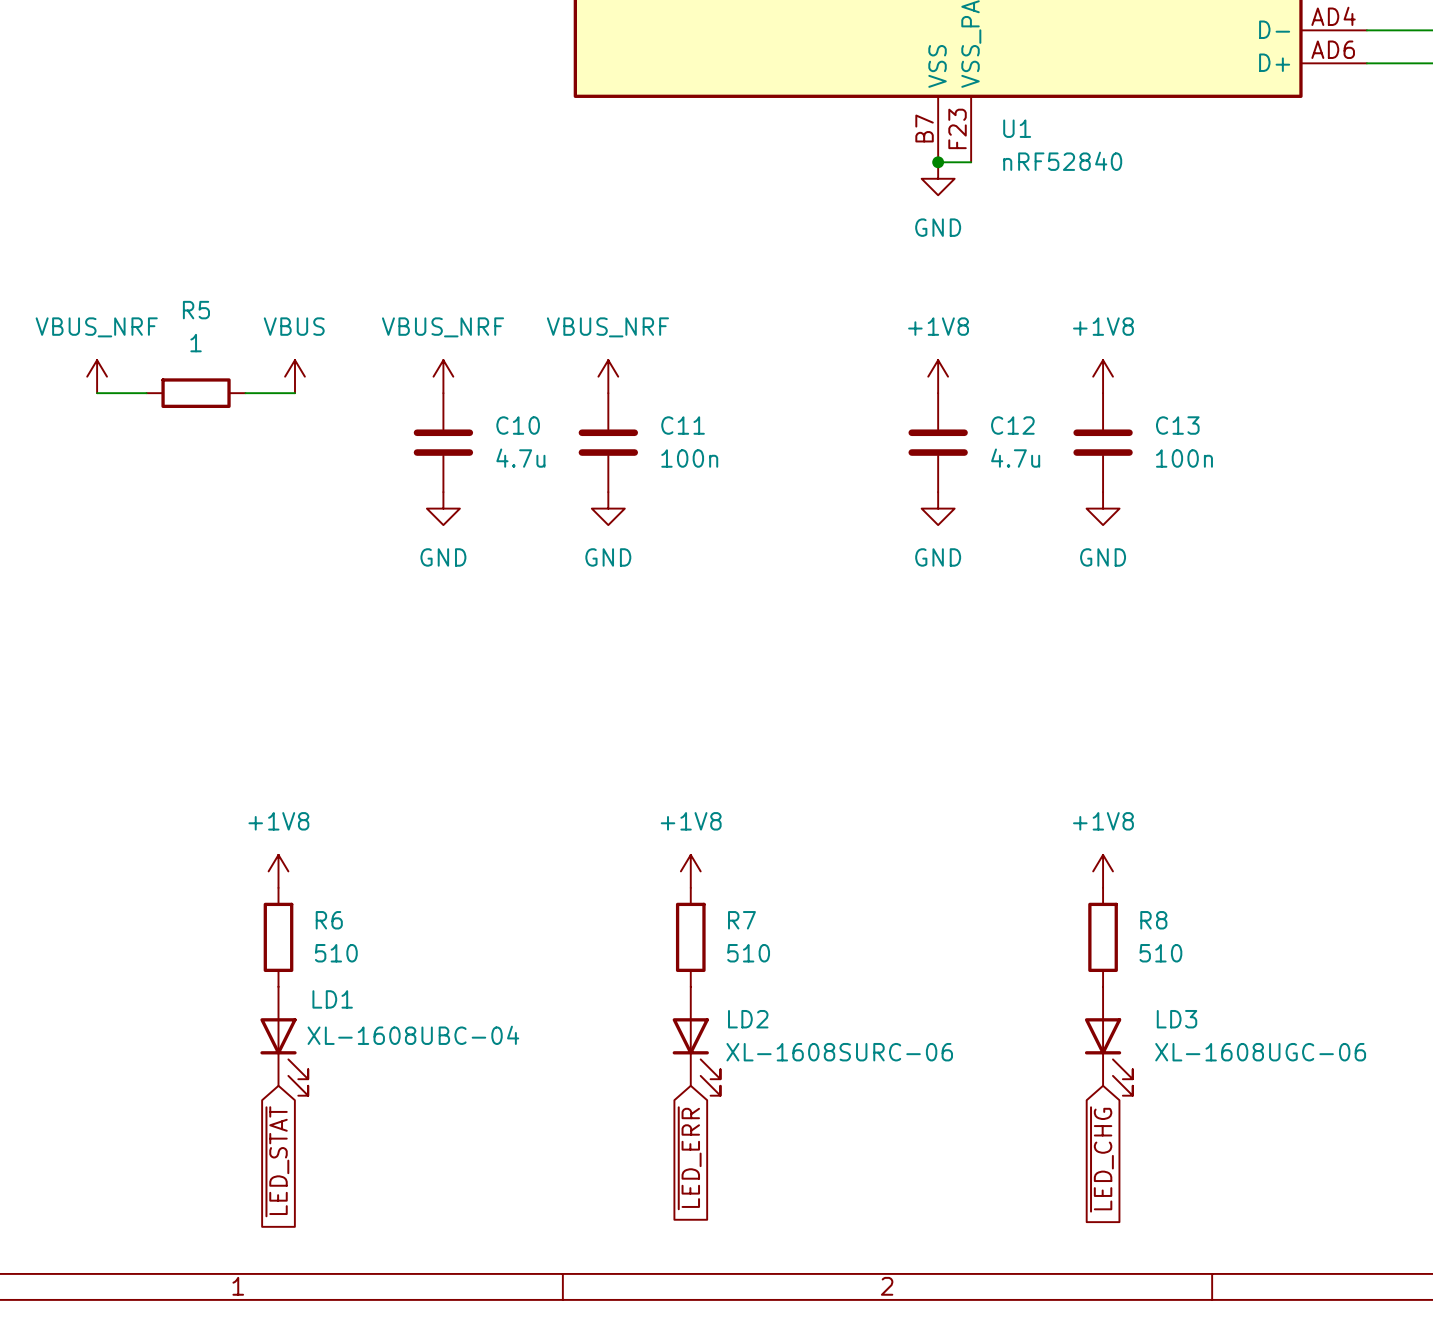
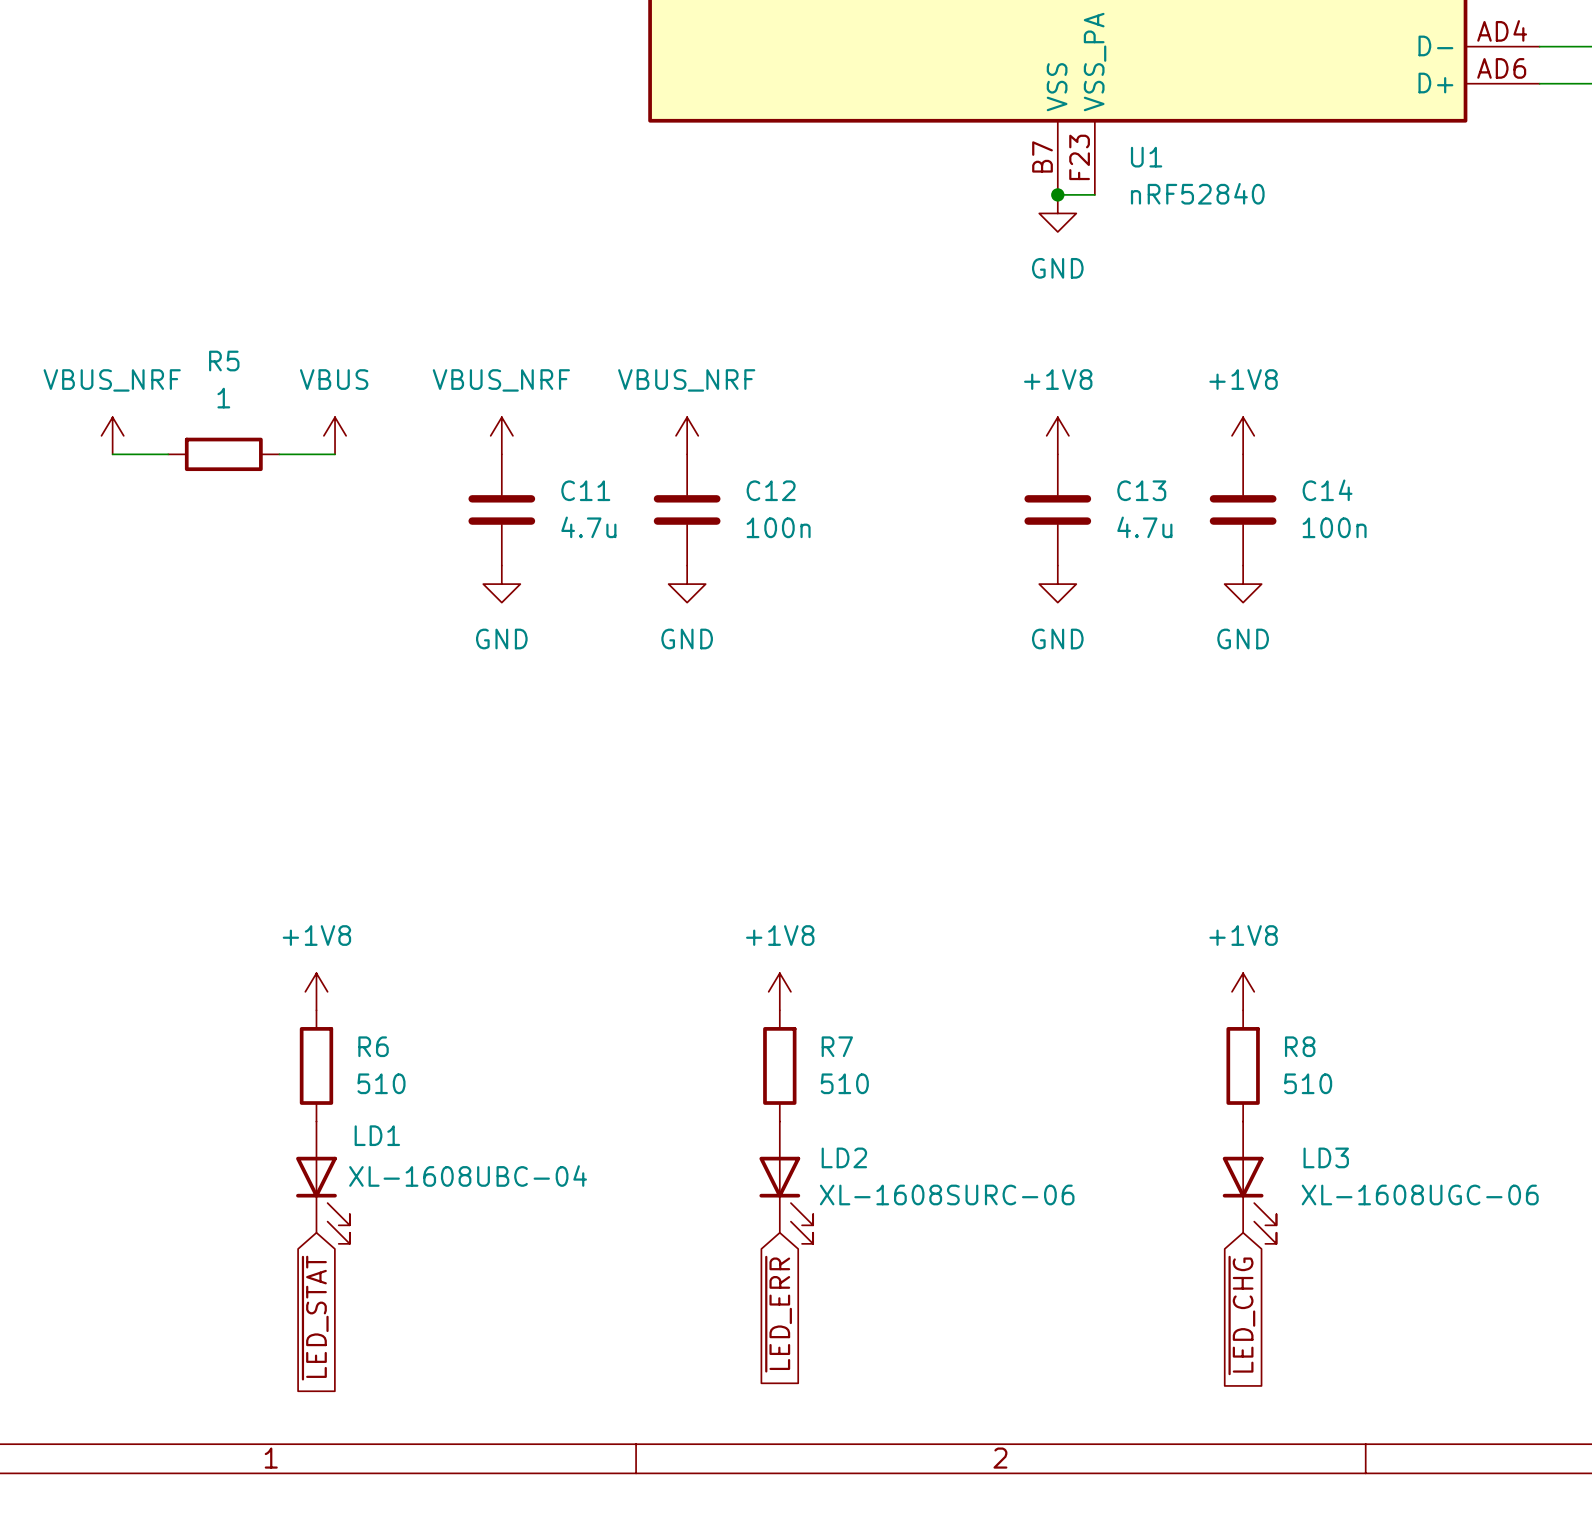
C10 name: C10 (518, 425) -> C11 (585, 490)
C11 name: C11 (683, 425) -> C12 (771, 490)
C12 name: C12 (1012, 425) -> C13 (1141, 490)
C13 name: C13 (1177, 425) -> C14 (1327, 490)

